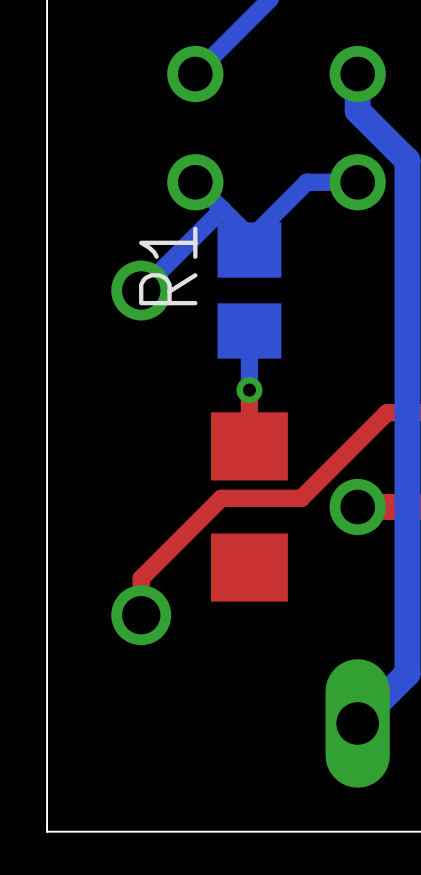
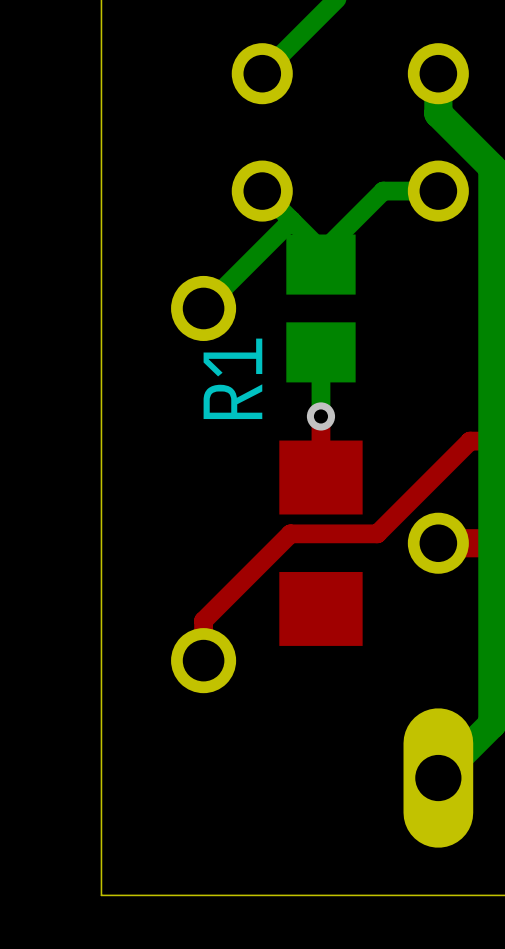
R1 name position: R1 (168, 266) -> R1 (232, 378)

